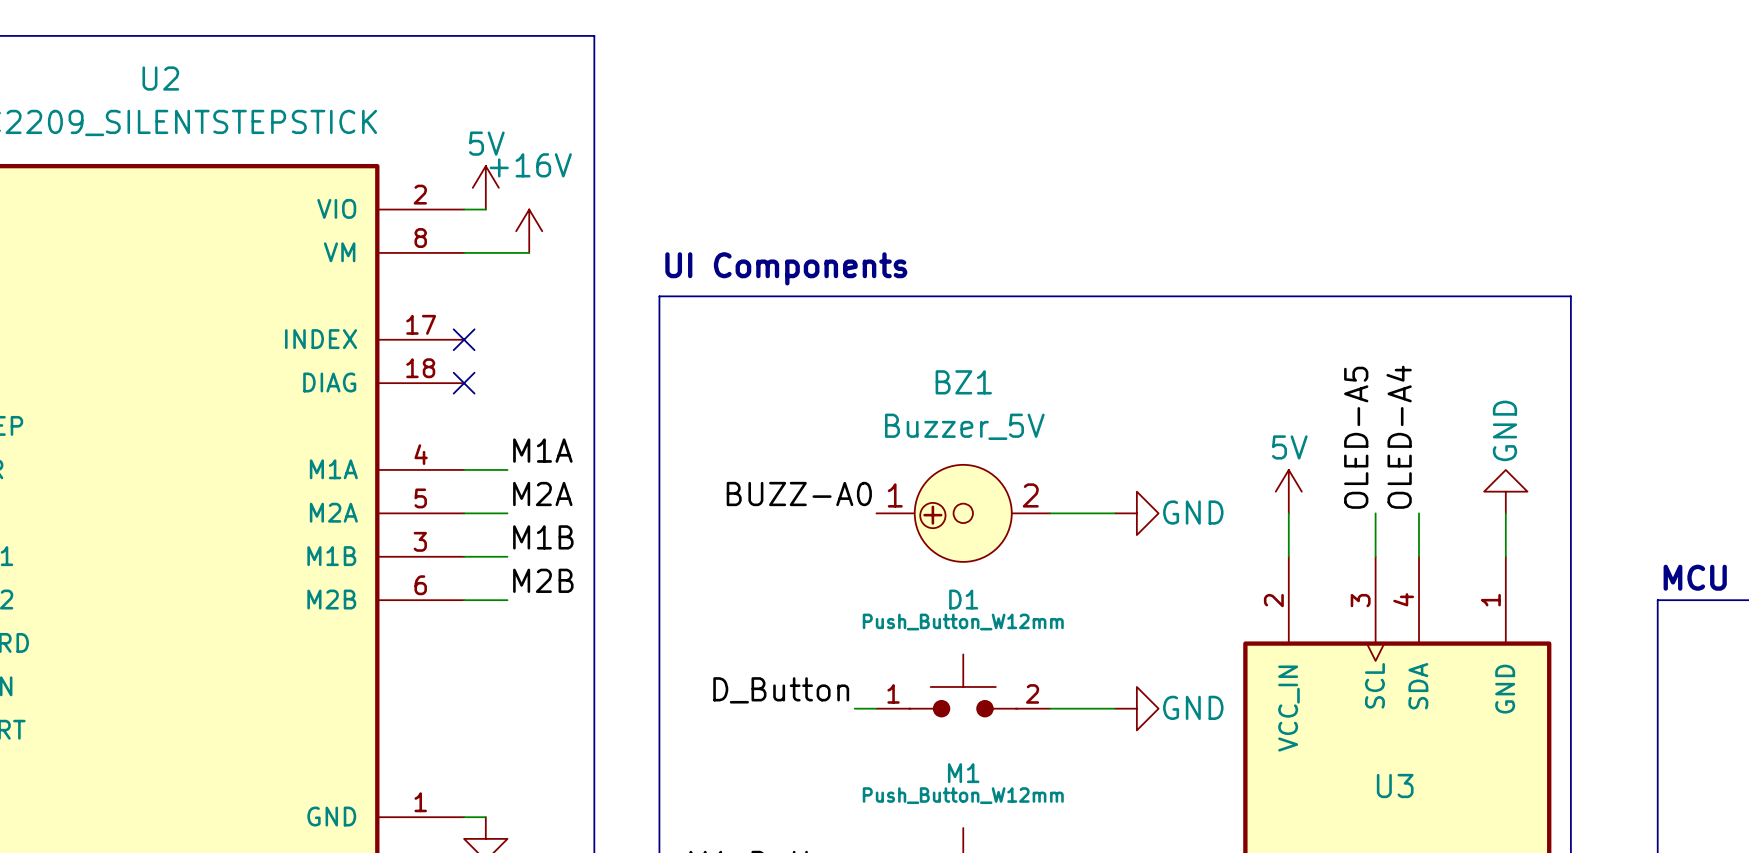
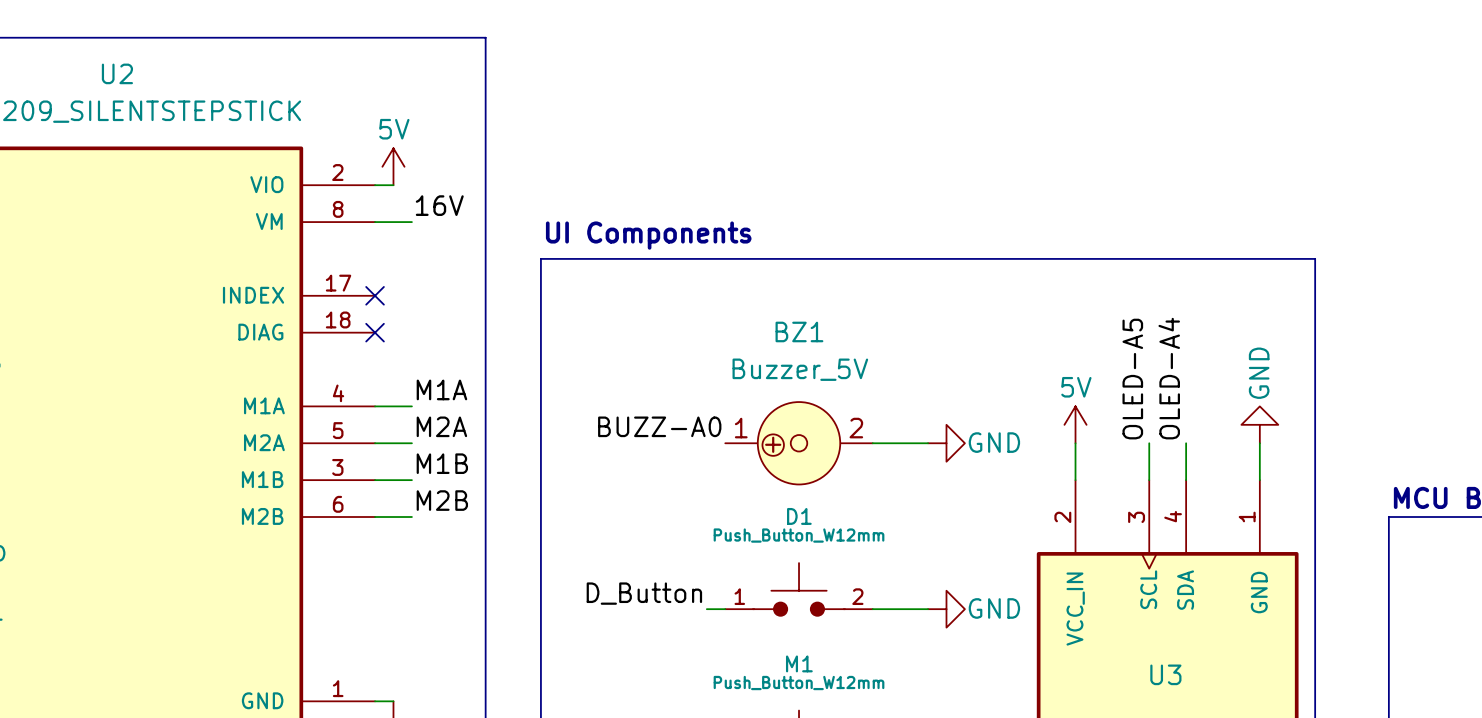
power symbol: +16V (529, 231) -> none
label: none -> 16V (439, 205)
wire: (507, 252) (529, 252) -> none

